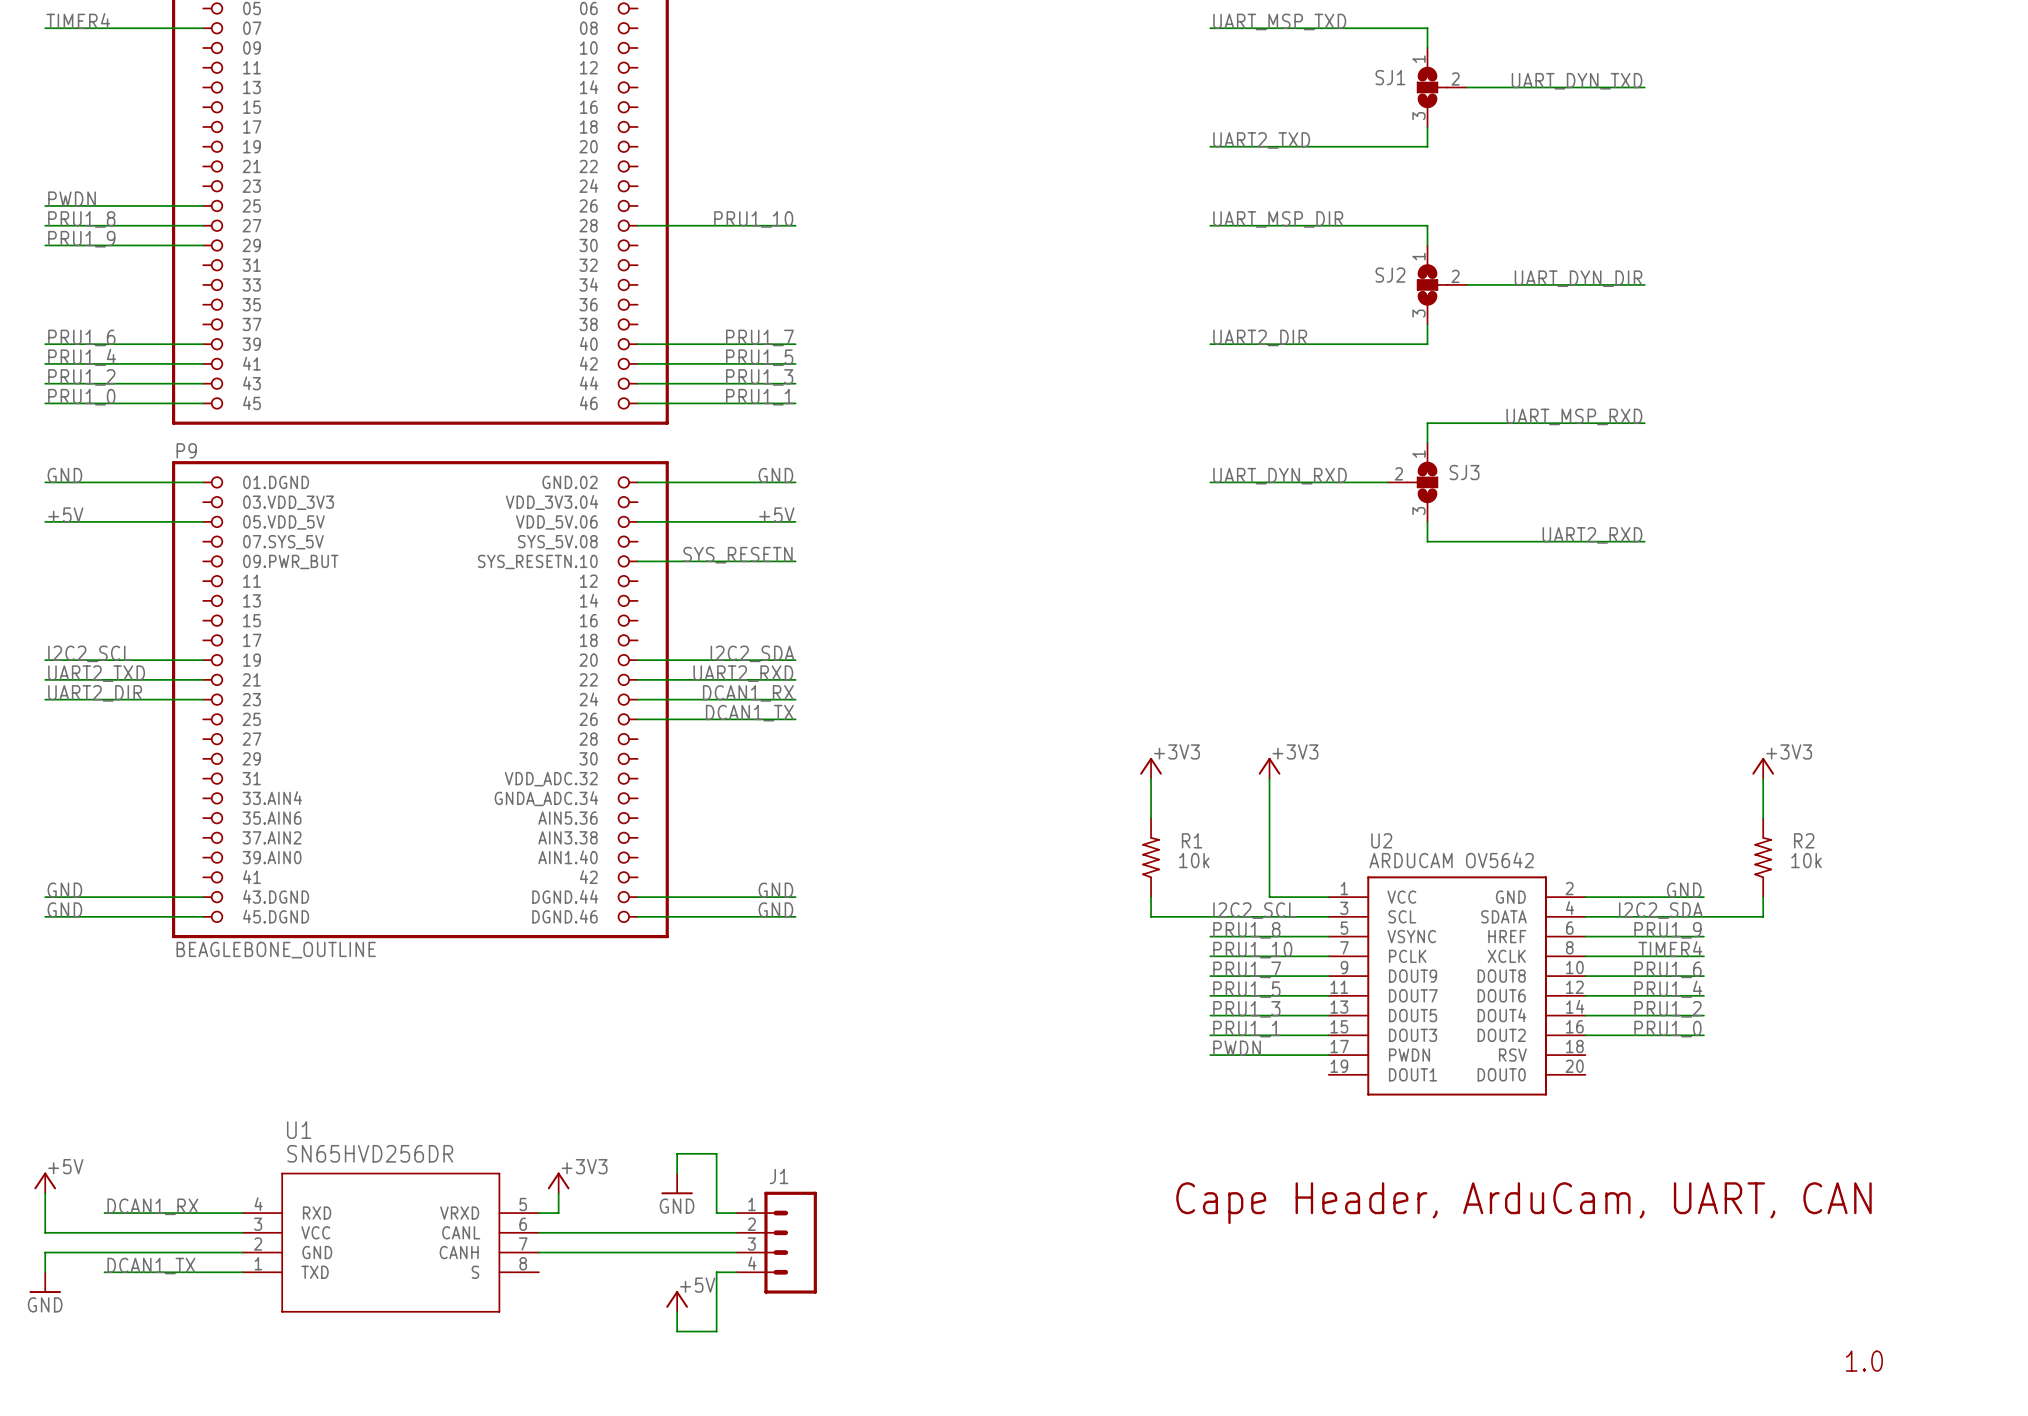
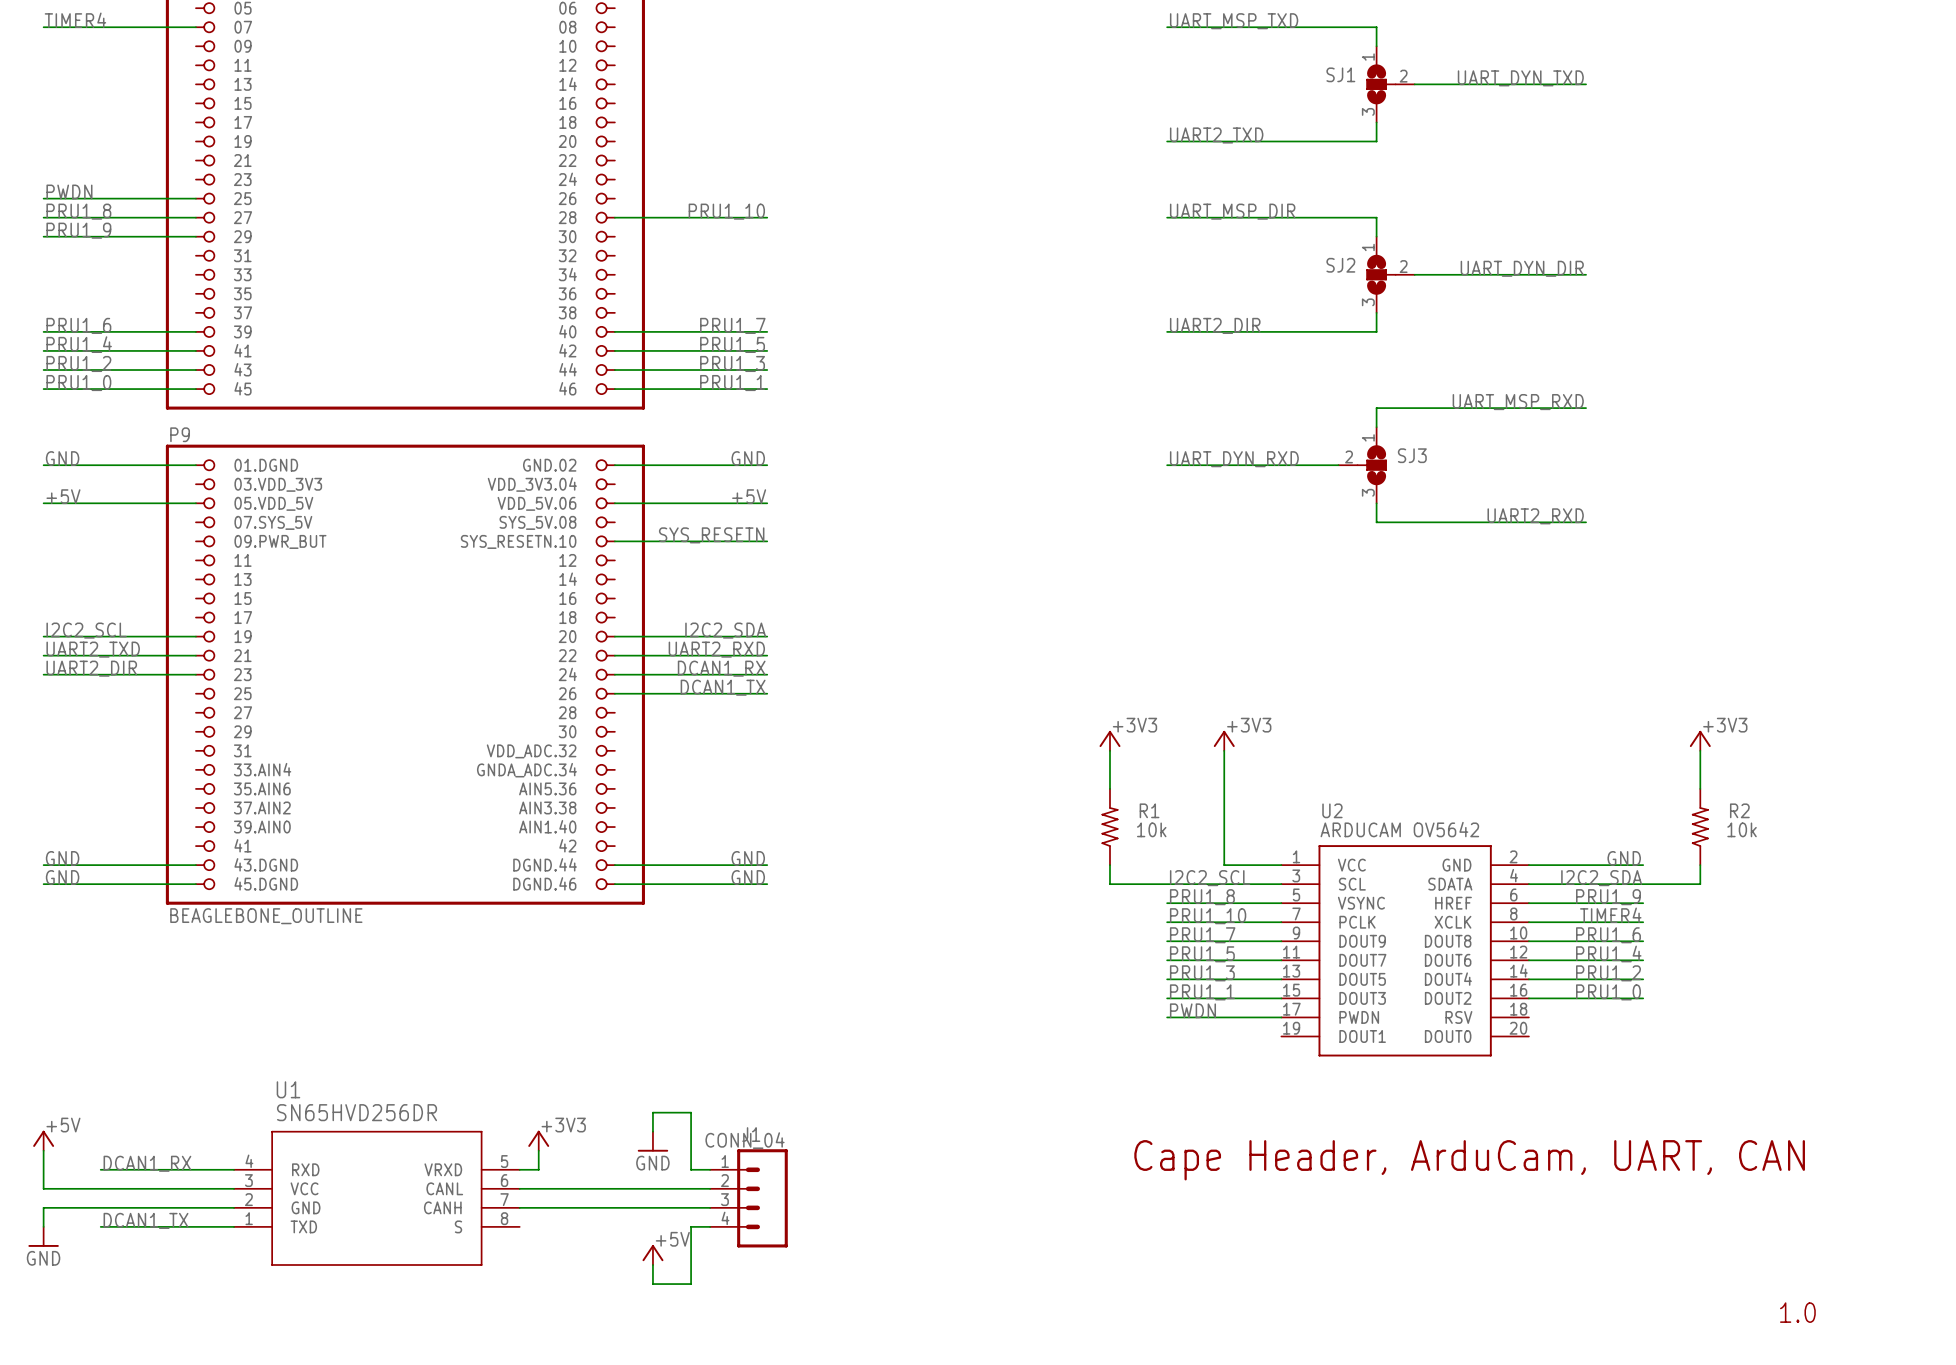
J1 value: none -> CONN_04 (745, 1140)

